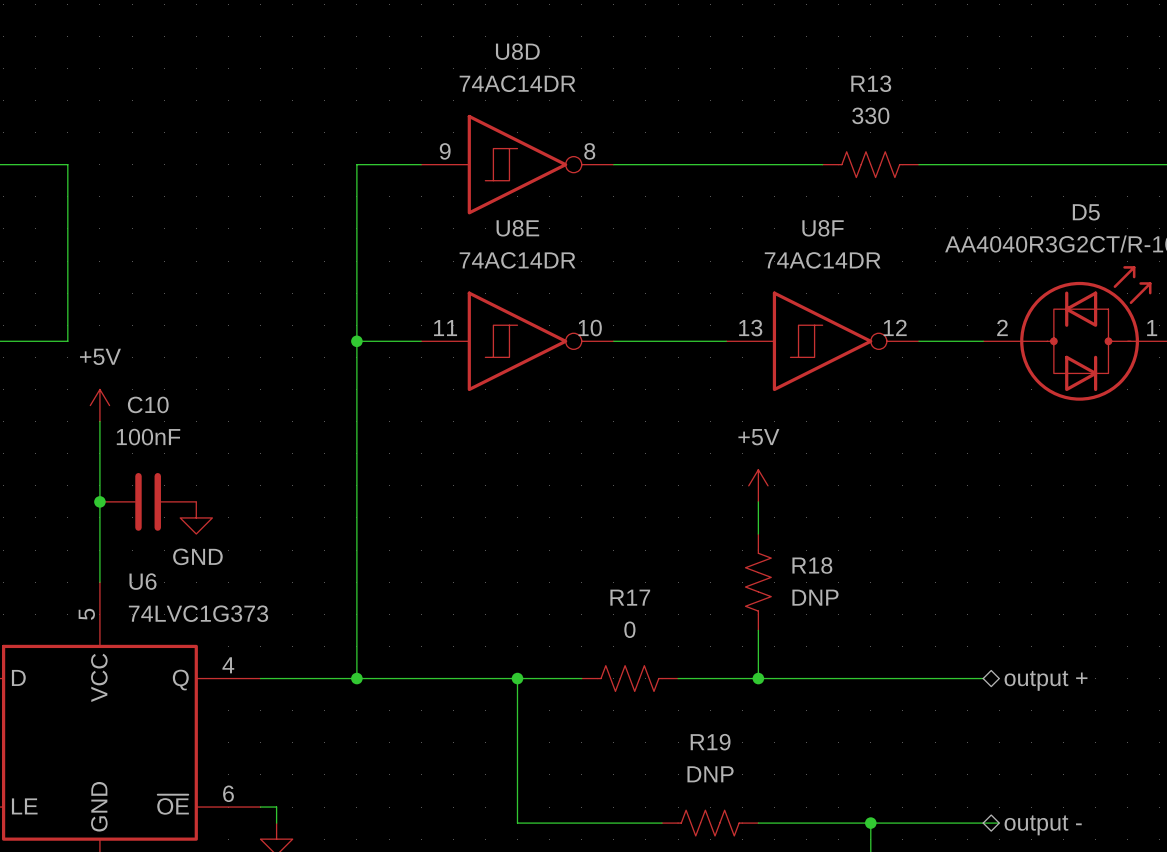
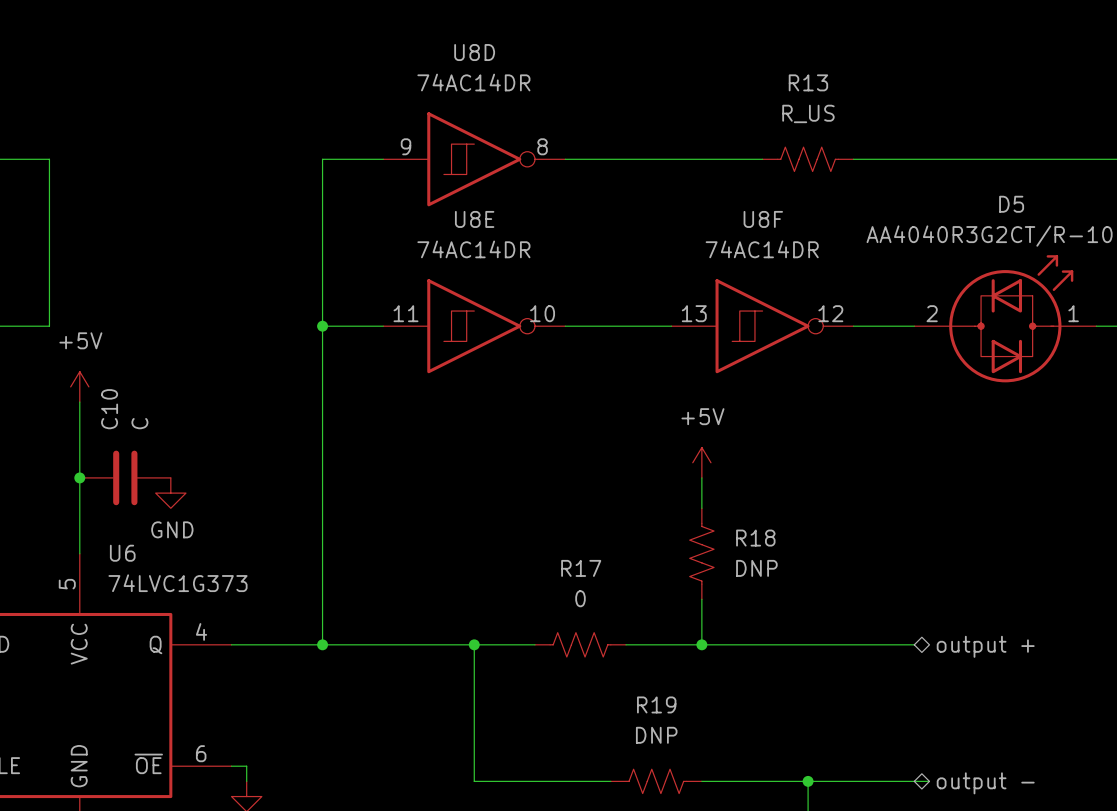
R13 value: 330 (870, 115) -> R_US (808, 113)
C10 name rotation: 0° (148, 404) -> 90° counterclockwise (109, 409)
C10 value: 100nF (148, 437) -> C (139, 423)

